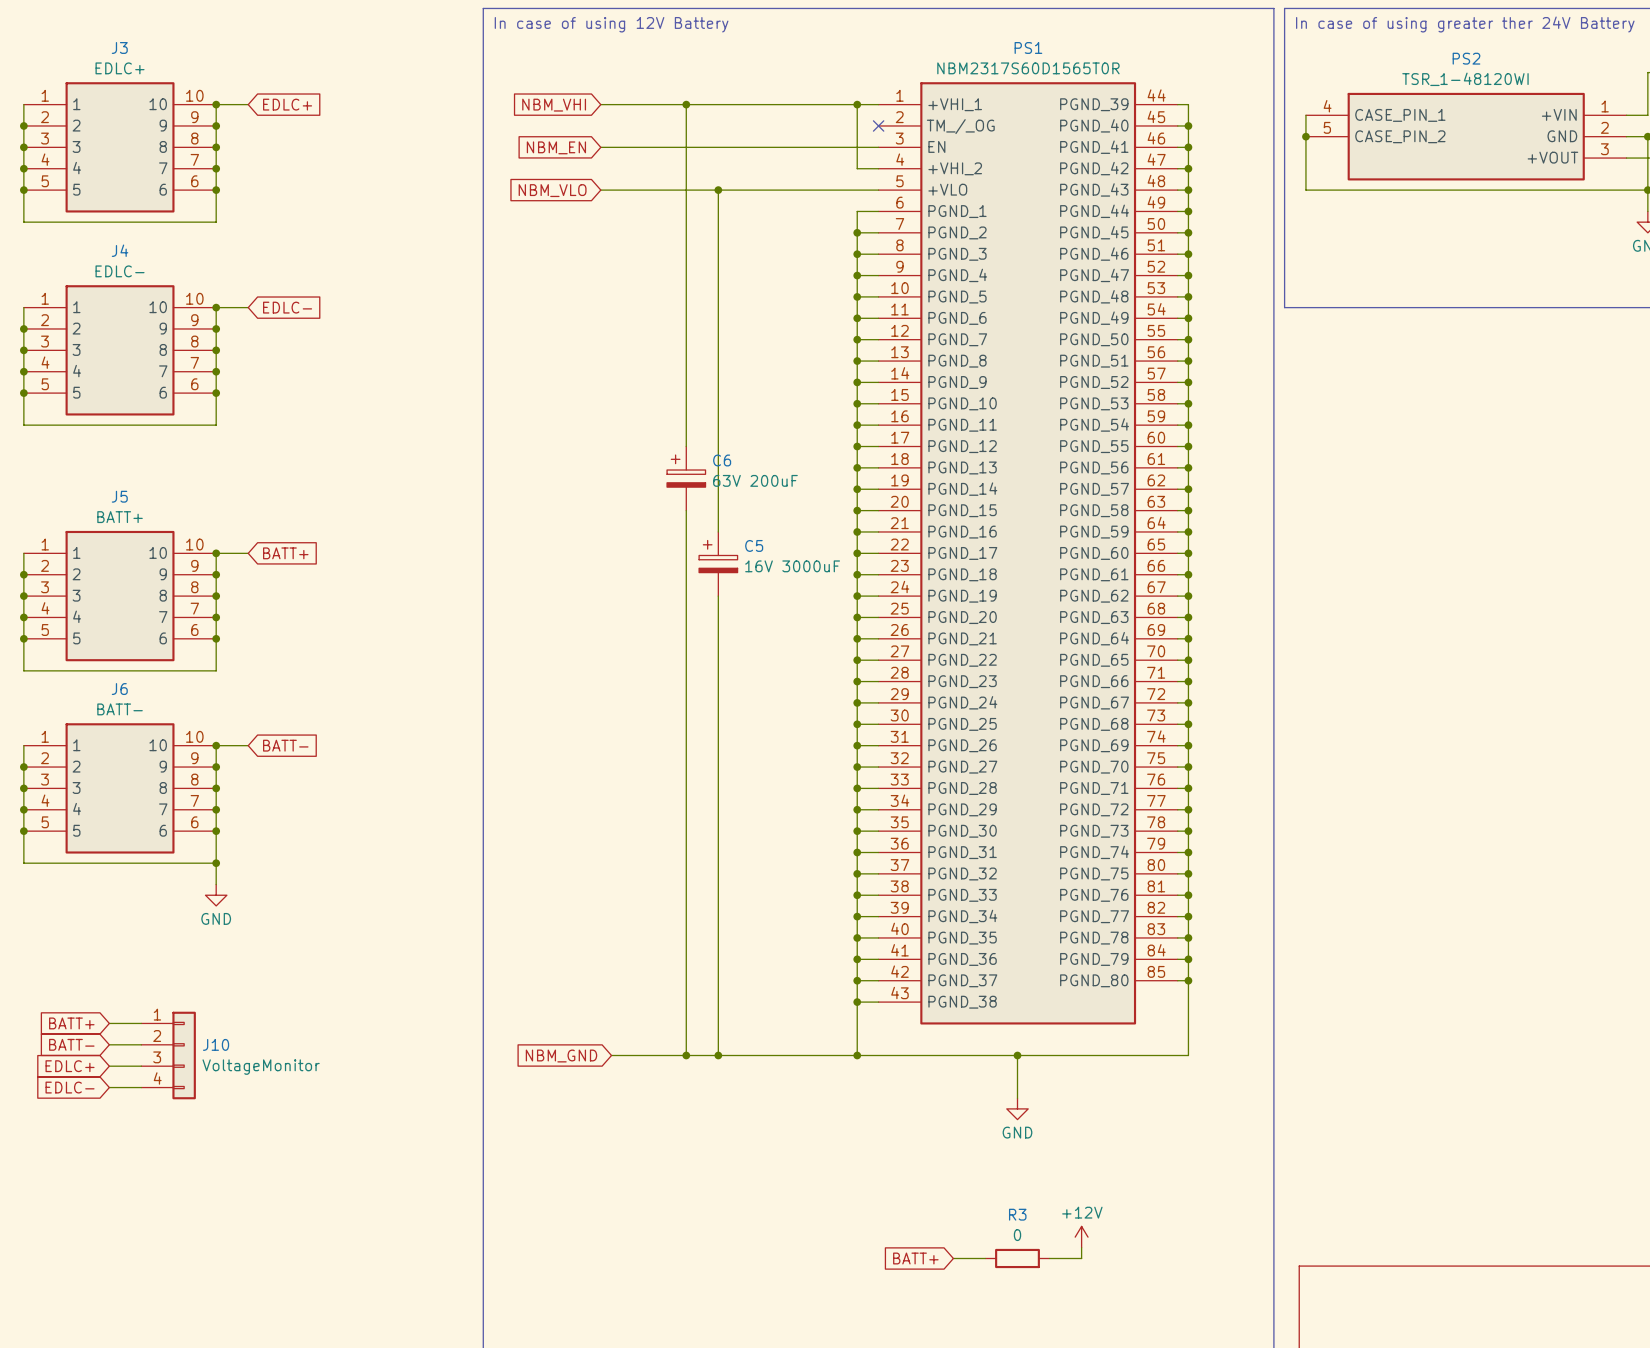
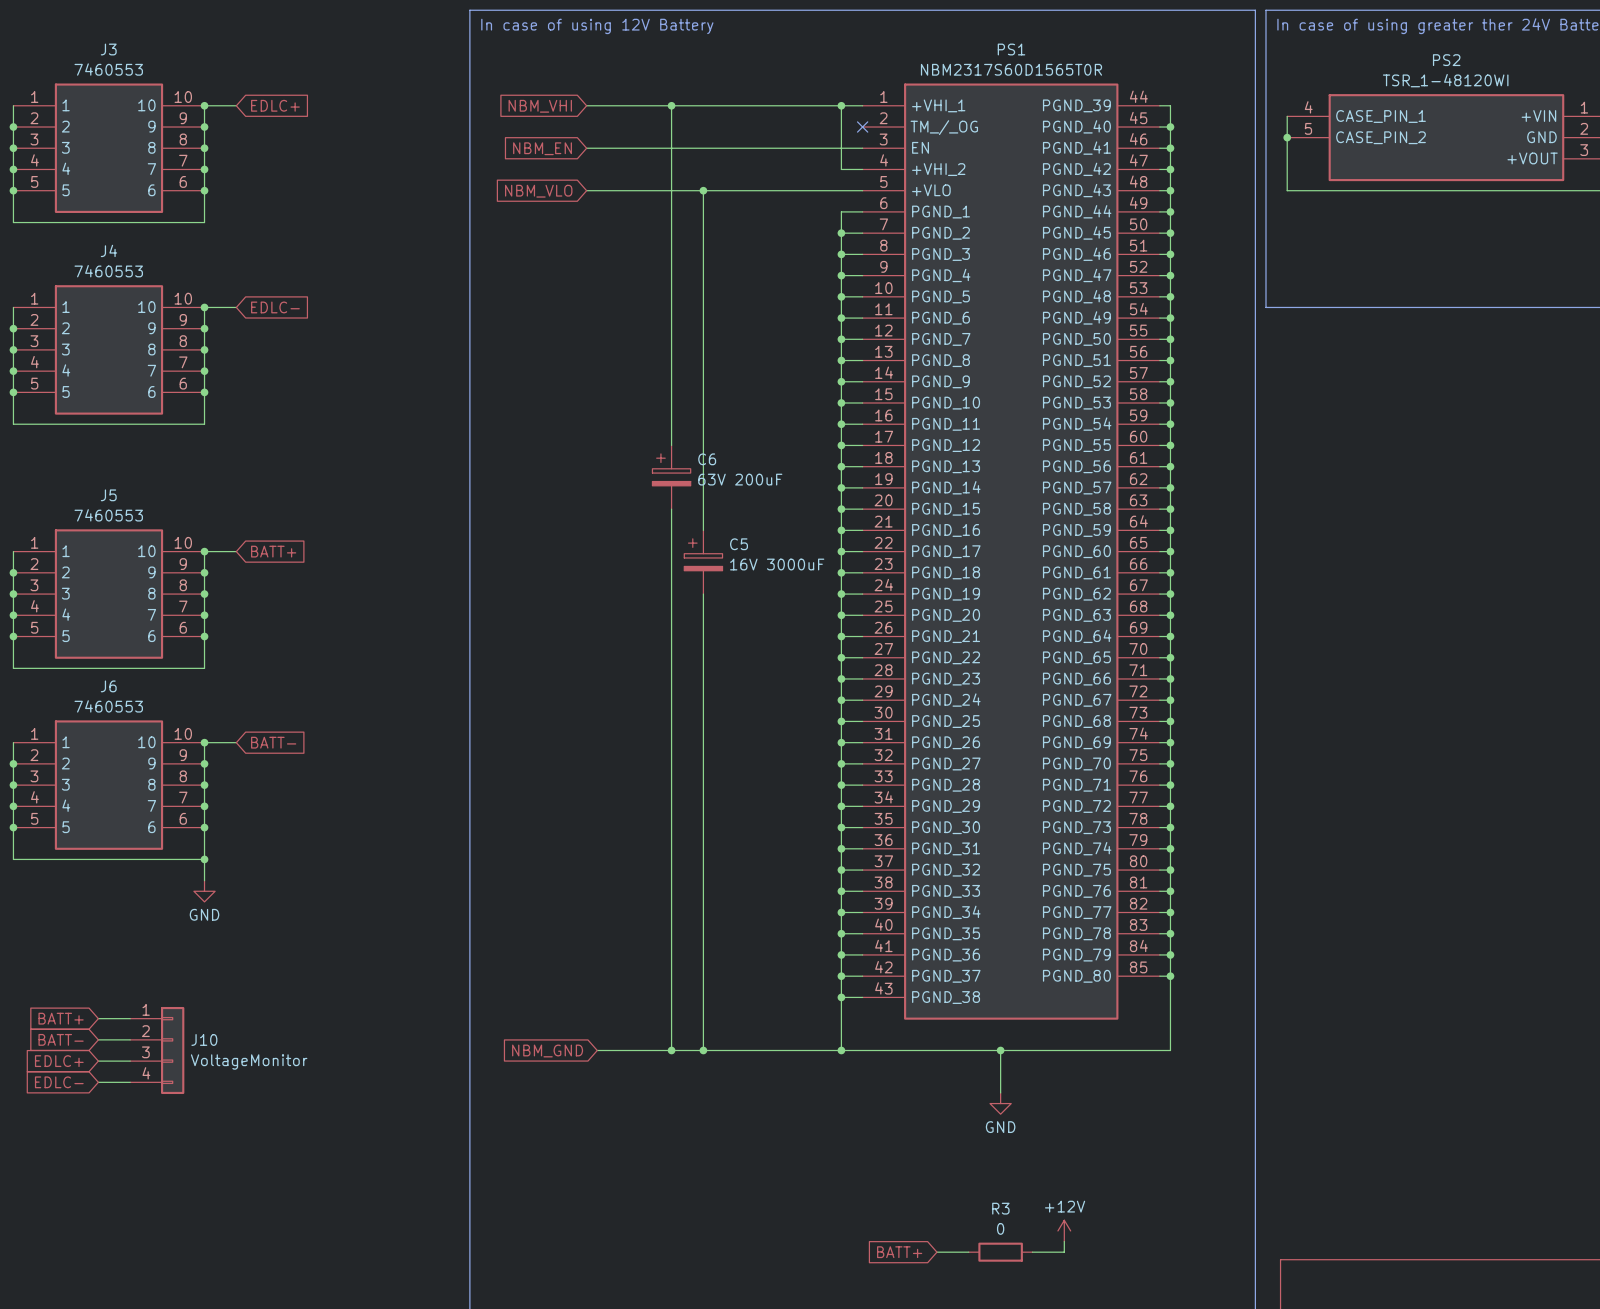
J3 value: EDLC+ (120, 68) -> 7460553 (108, 69)
J4 value: EDLC- (120, 271) -> 7460553 (108, 271)
J5 value: BATT+ (120, 517) -> 7460553 (108, 515)
J6 value: BATT- (120, 709) -> 7460553 (108, 706)

